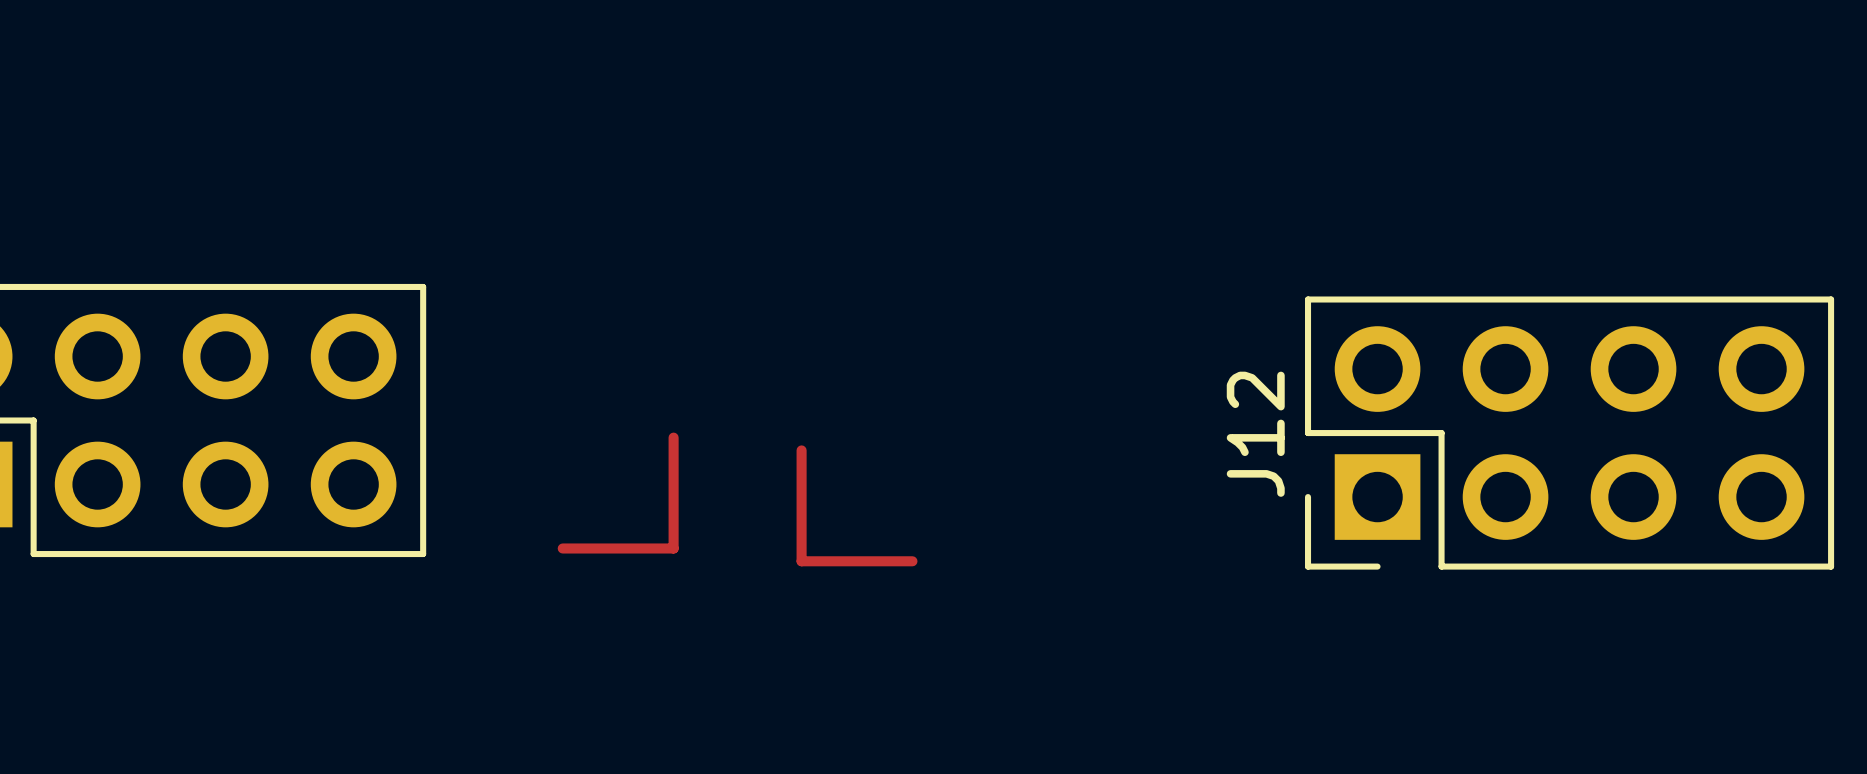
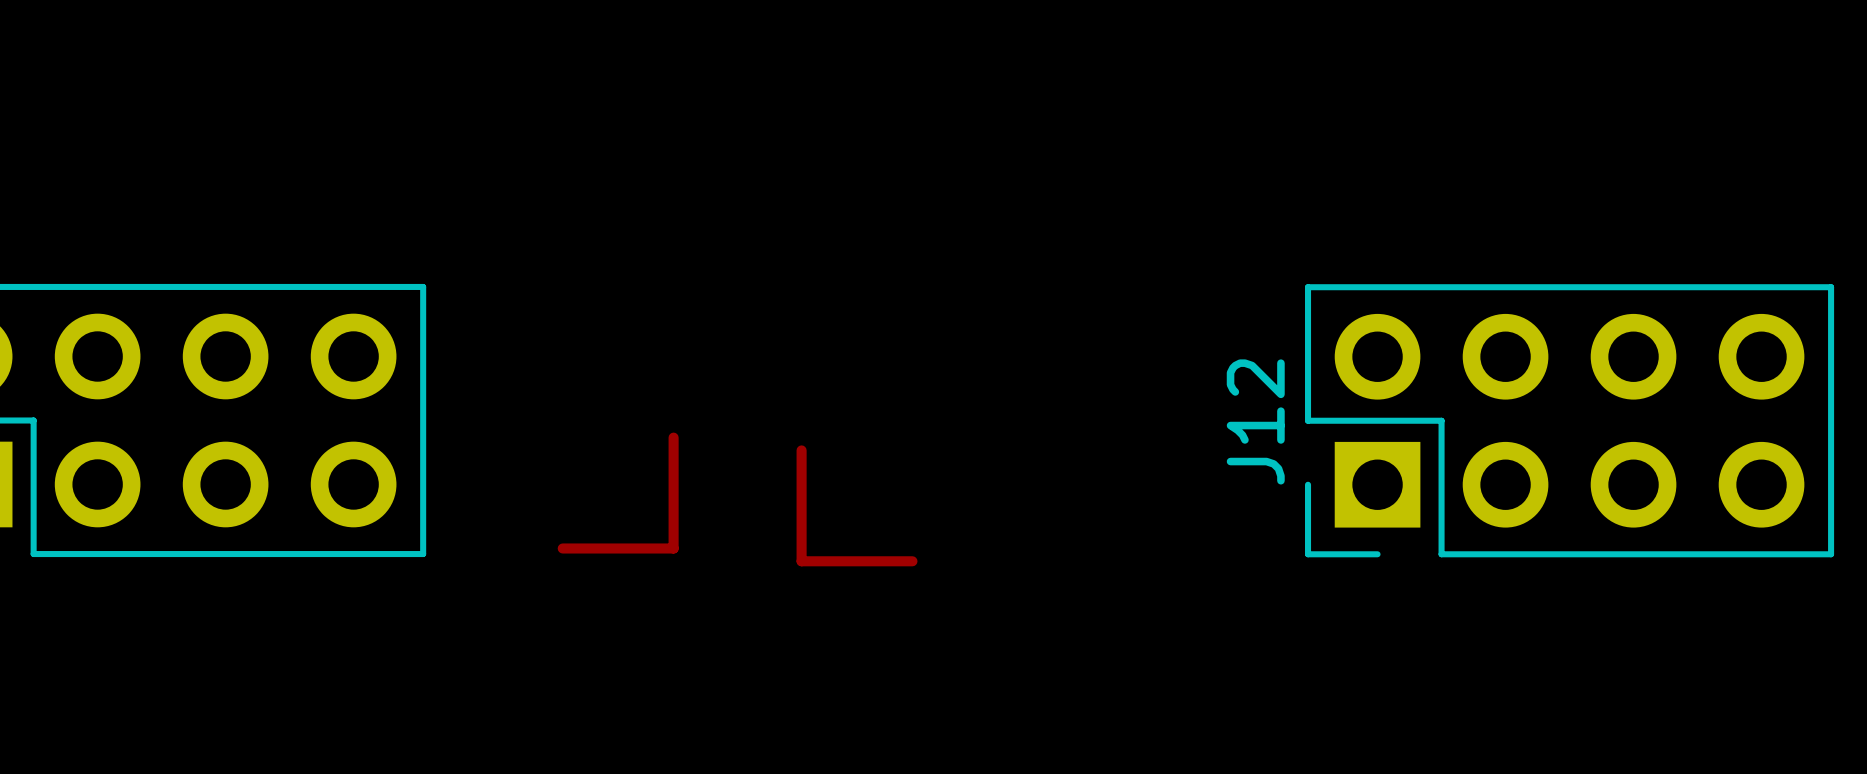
J12 position: (1569, 433) -> (1569, 420)

